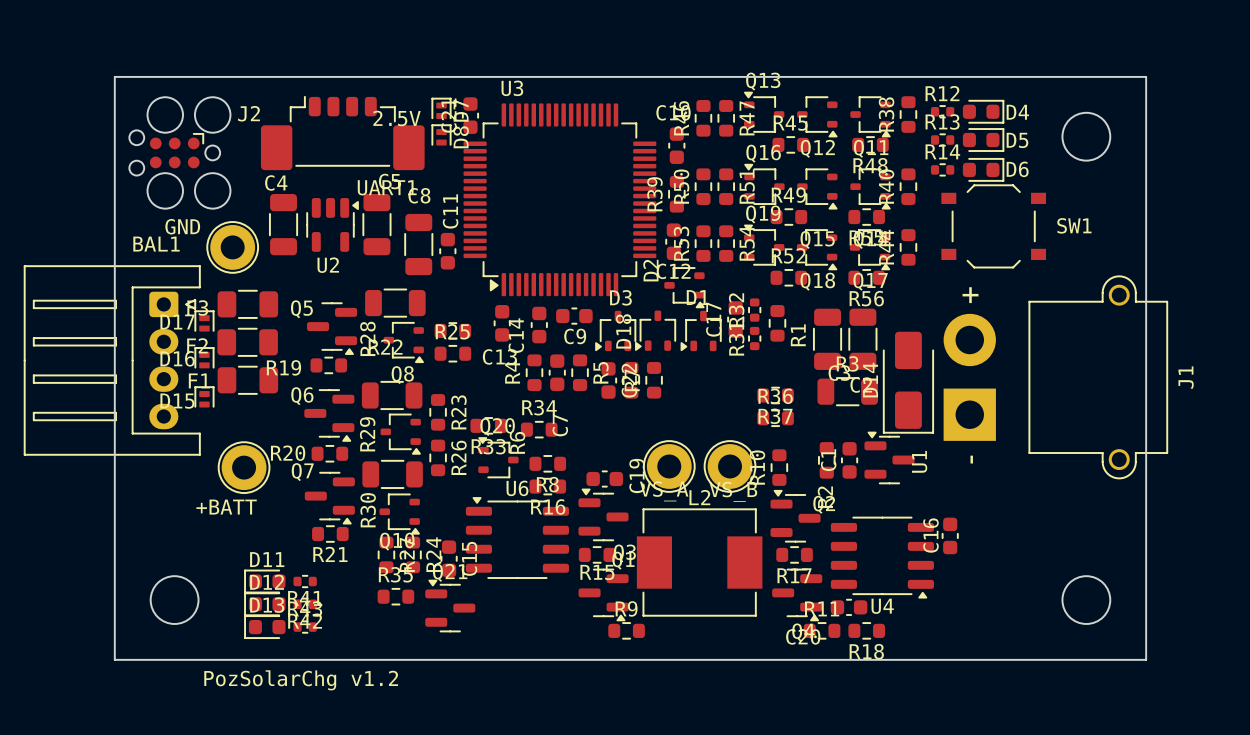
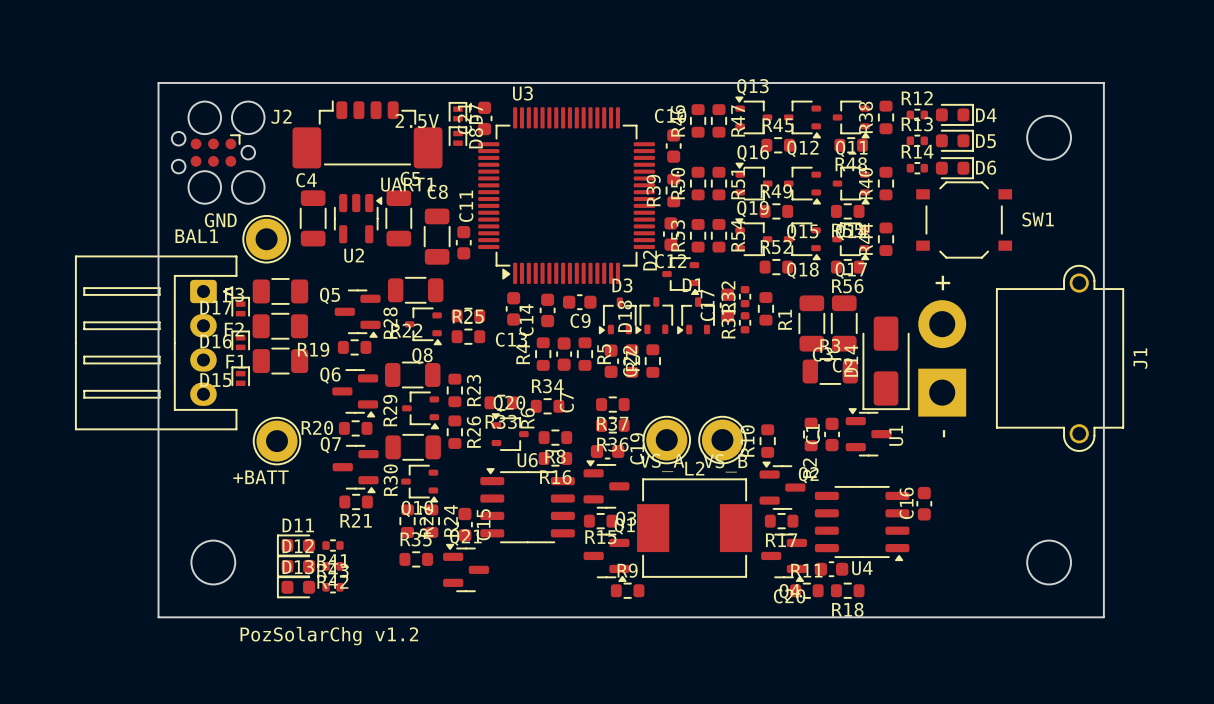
R37 position: (775, 395) -> (612, 404)
R36 name position: R36 (775, 396) -> R36 (612, 444)
R36 position: (775, 418) -> (612, 425)

